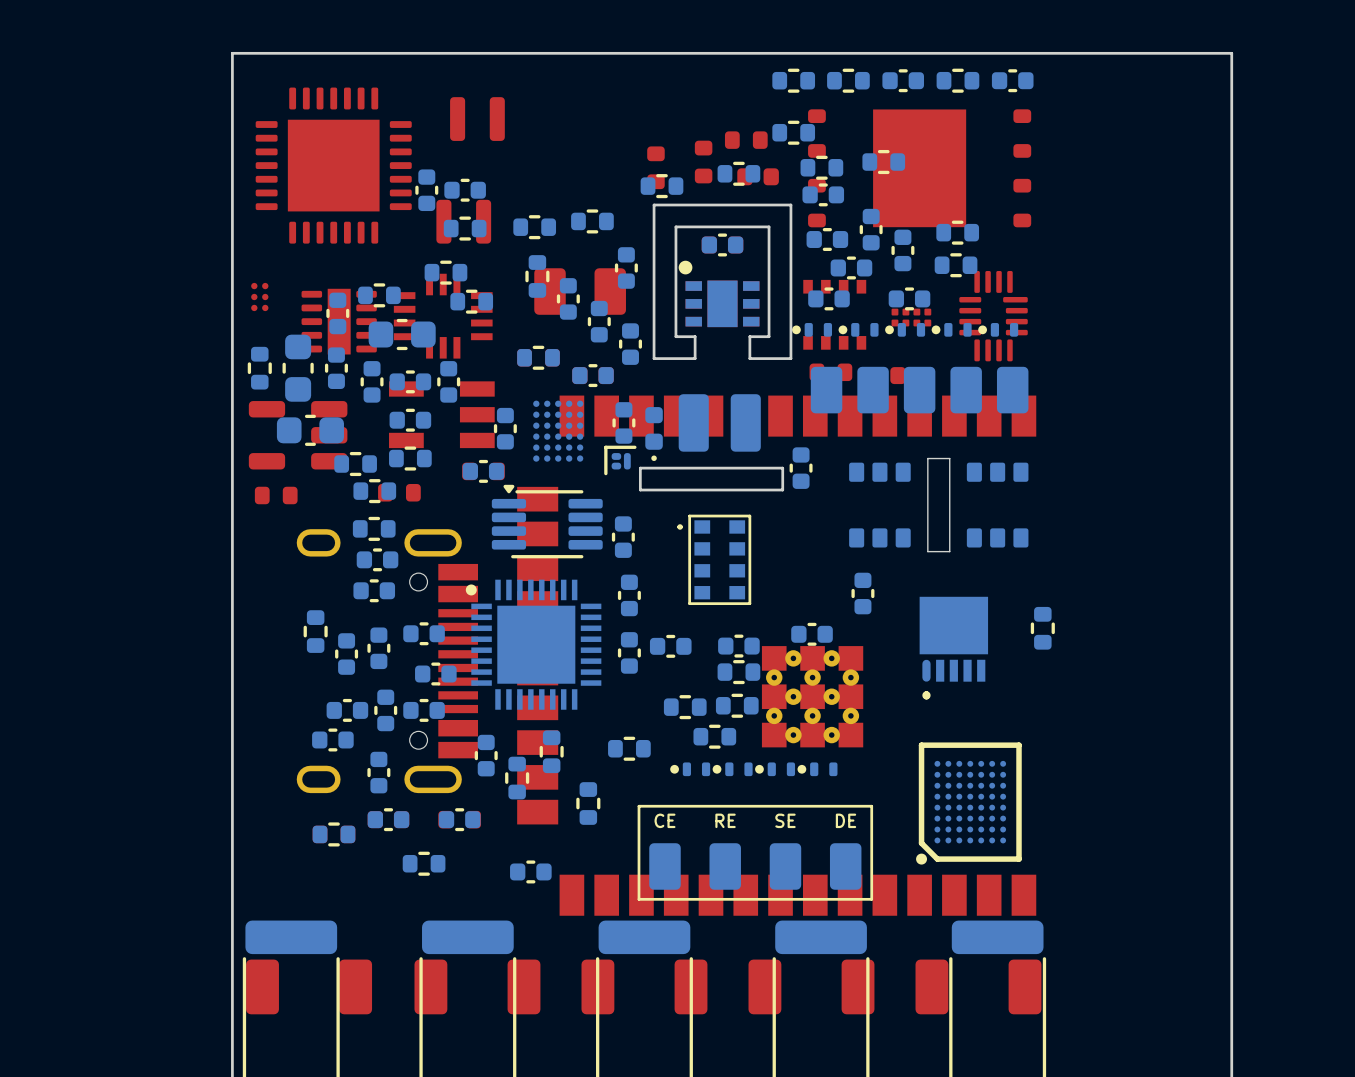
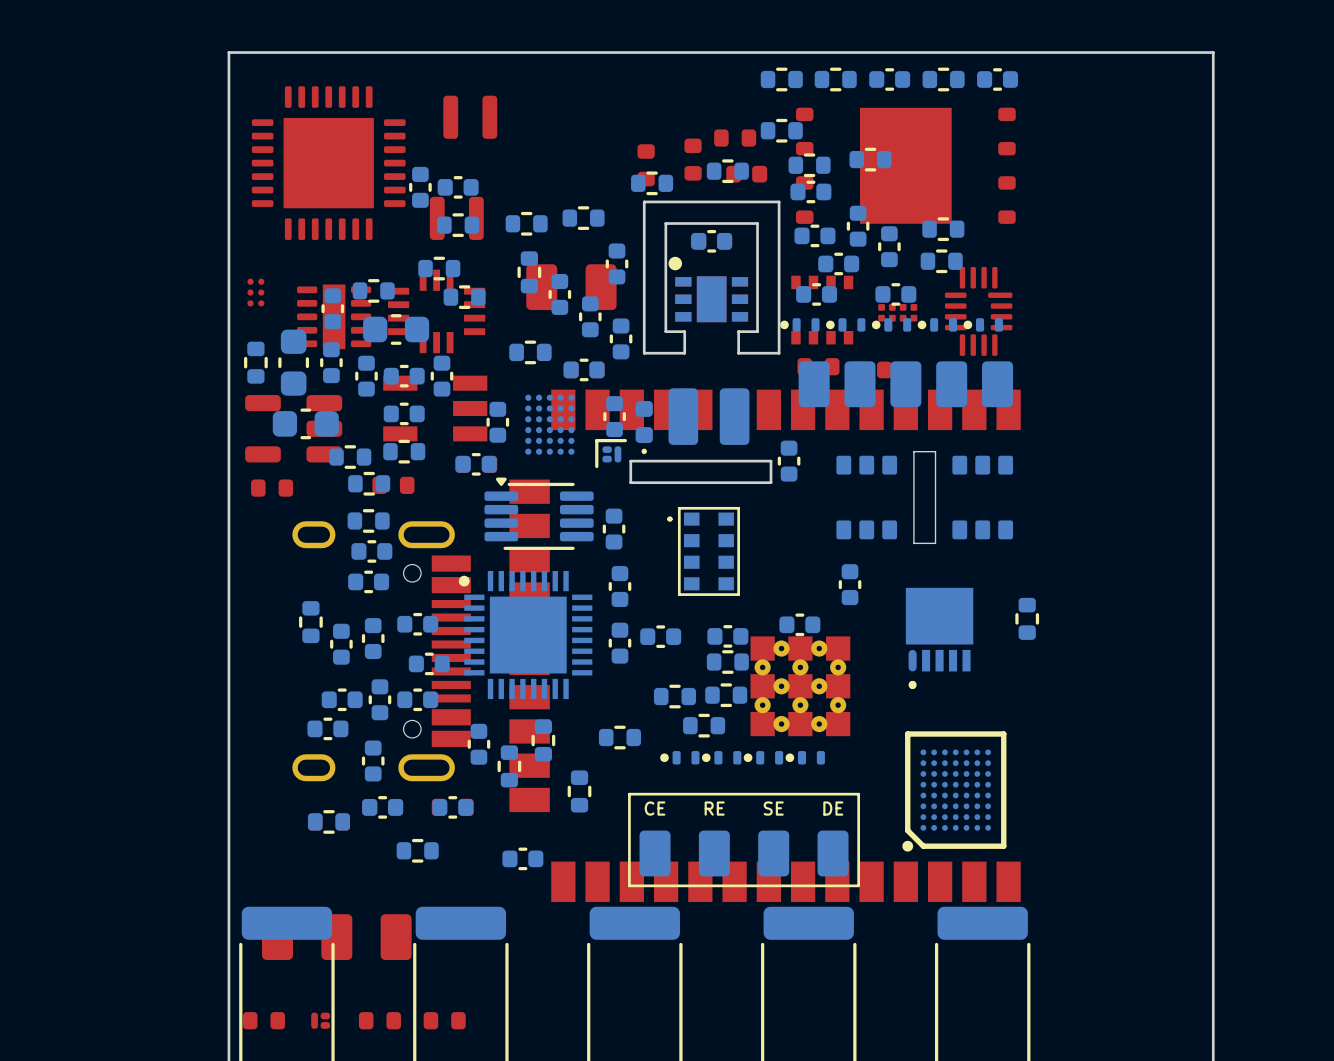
part: none -> (336, 937)
part: (309, 986) -> none
part: (477, 986) -> none
part: (644, 986) -> none
part: (811, 986) -> none
part: (978, 986) -> none
part: none -> (263, 1020)
part: none -> (320, 1020)
part: none -> (379, 1020)
part: none -> (444, 1020)

